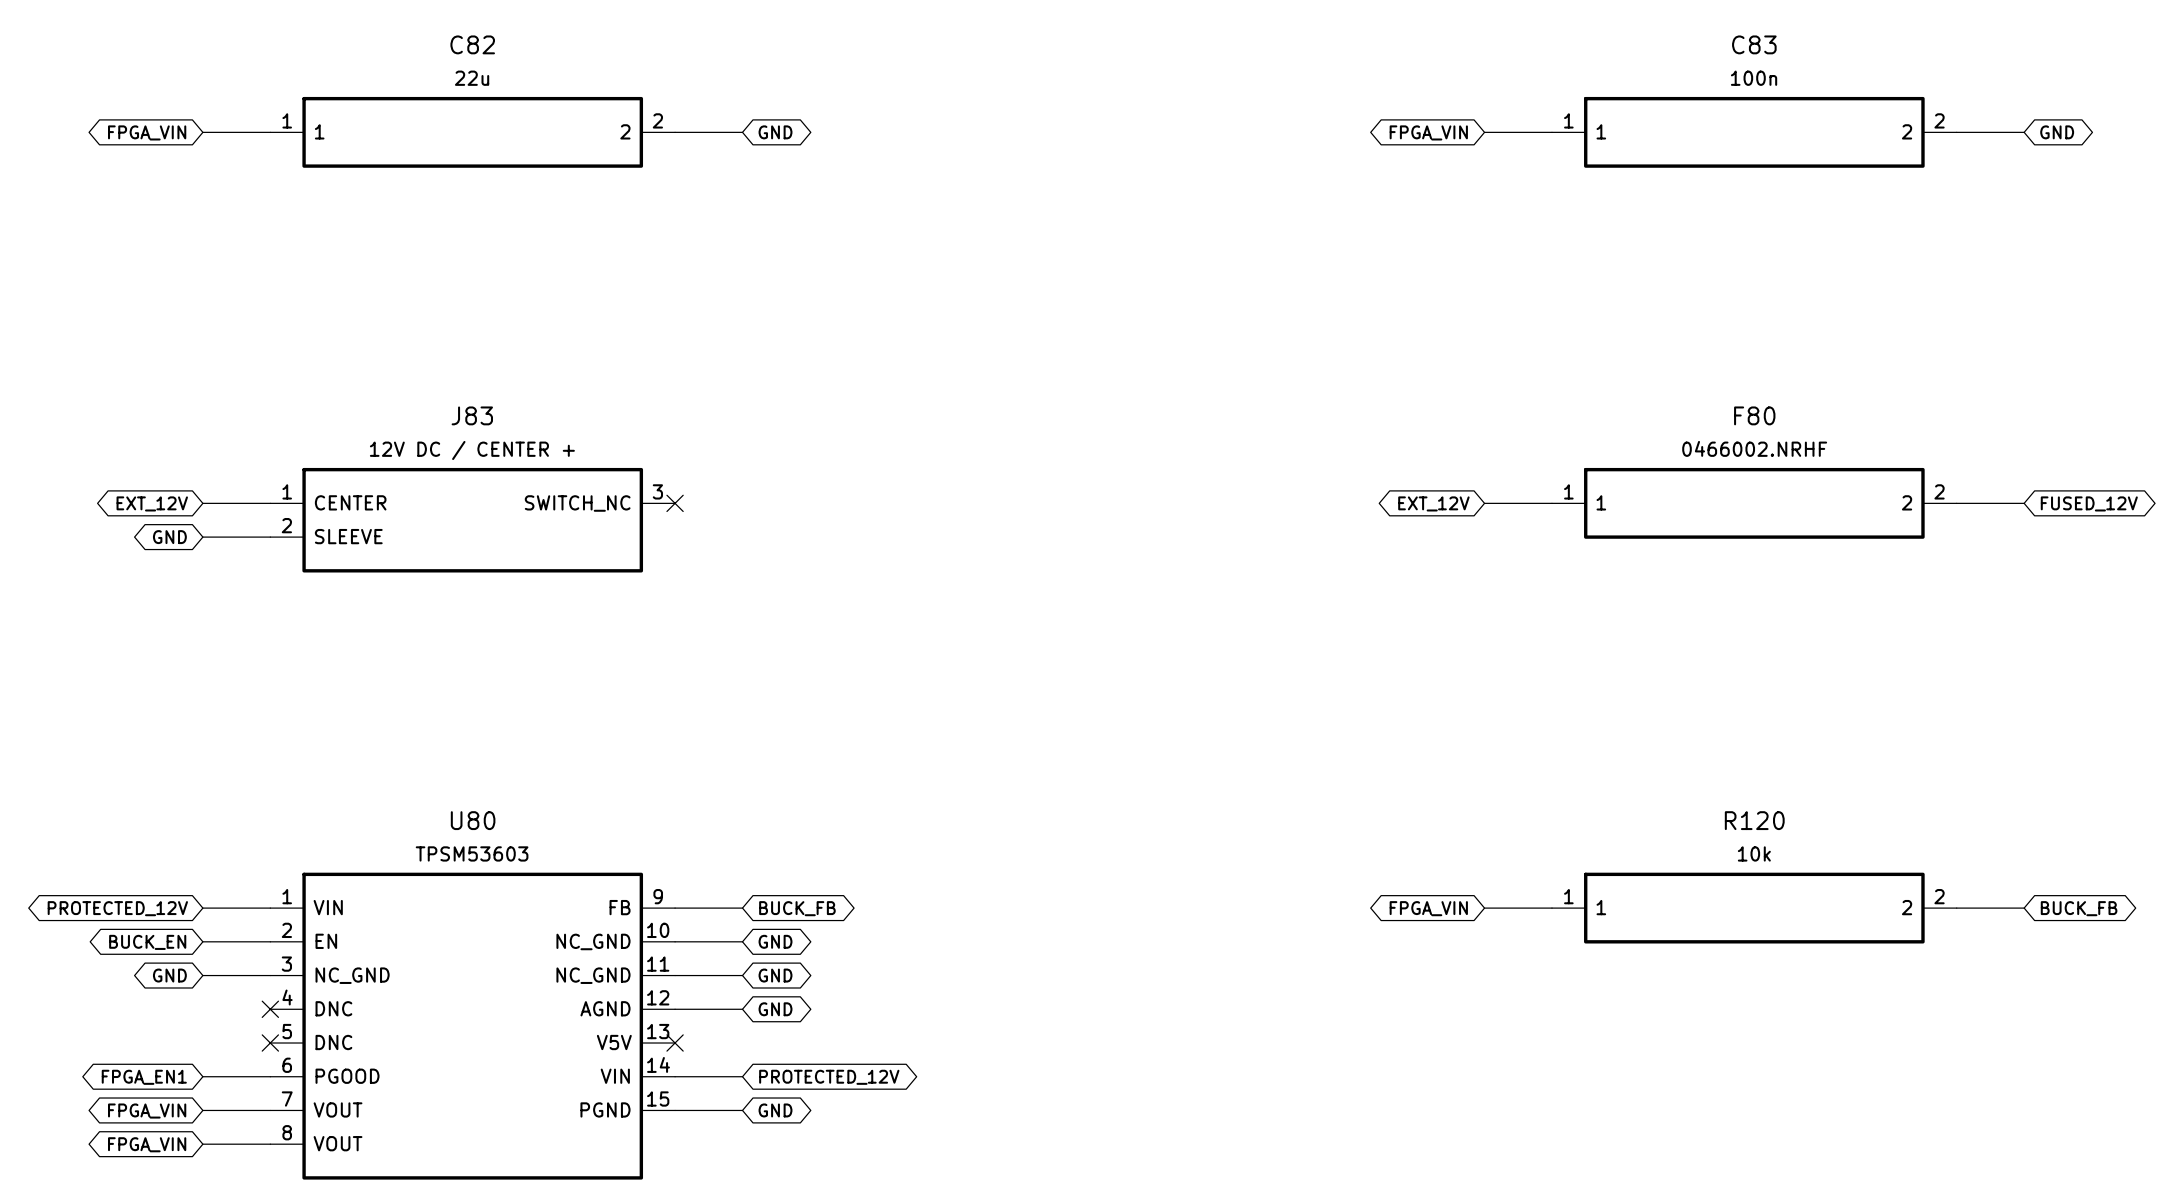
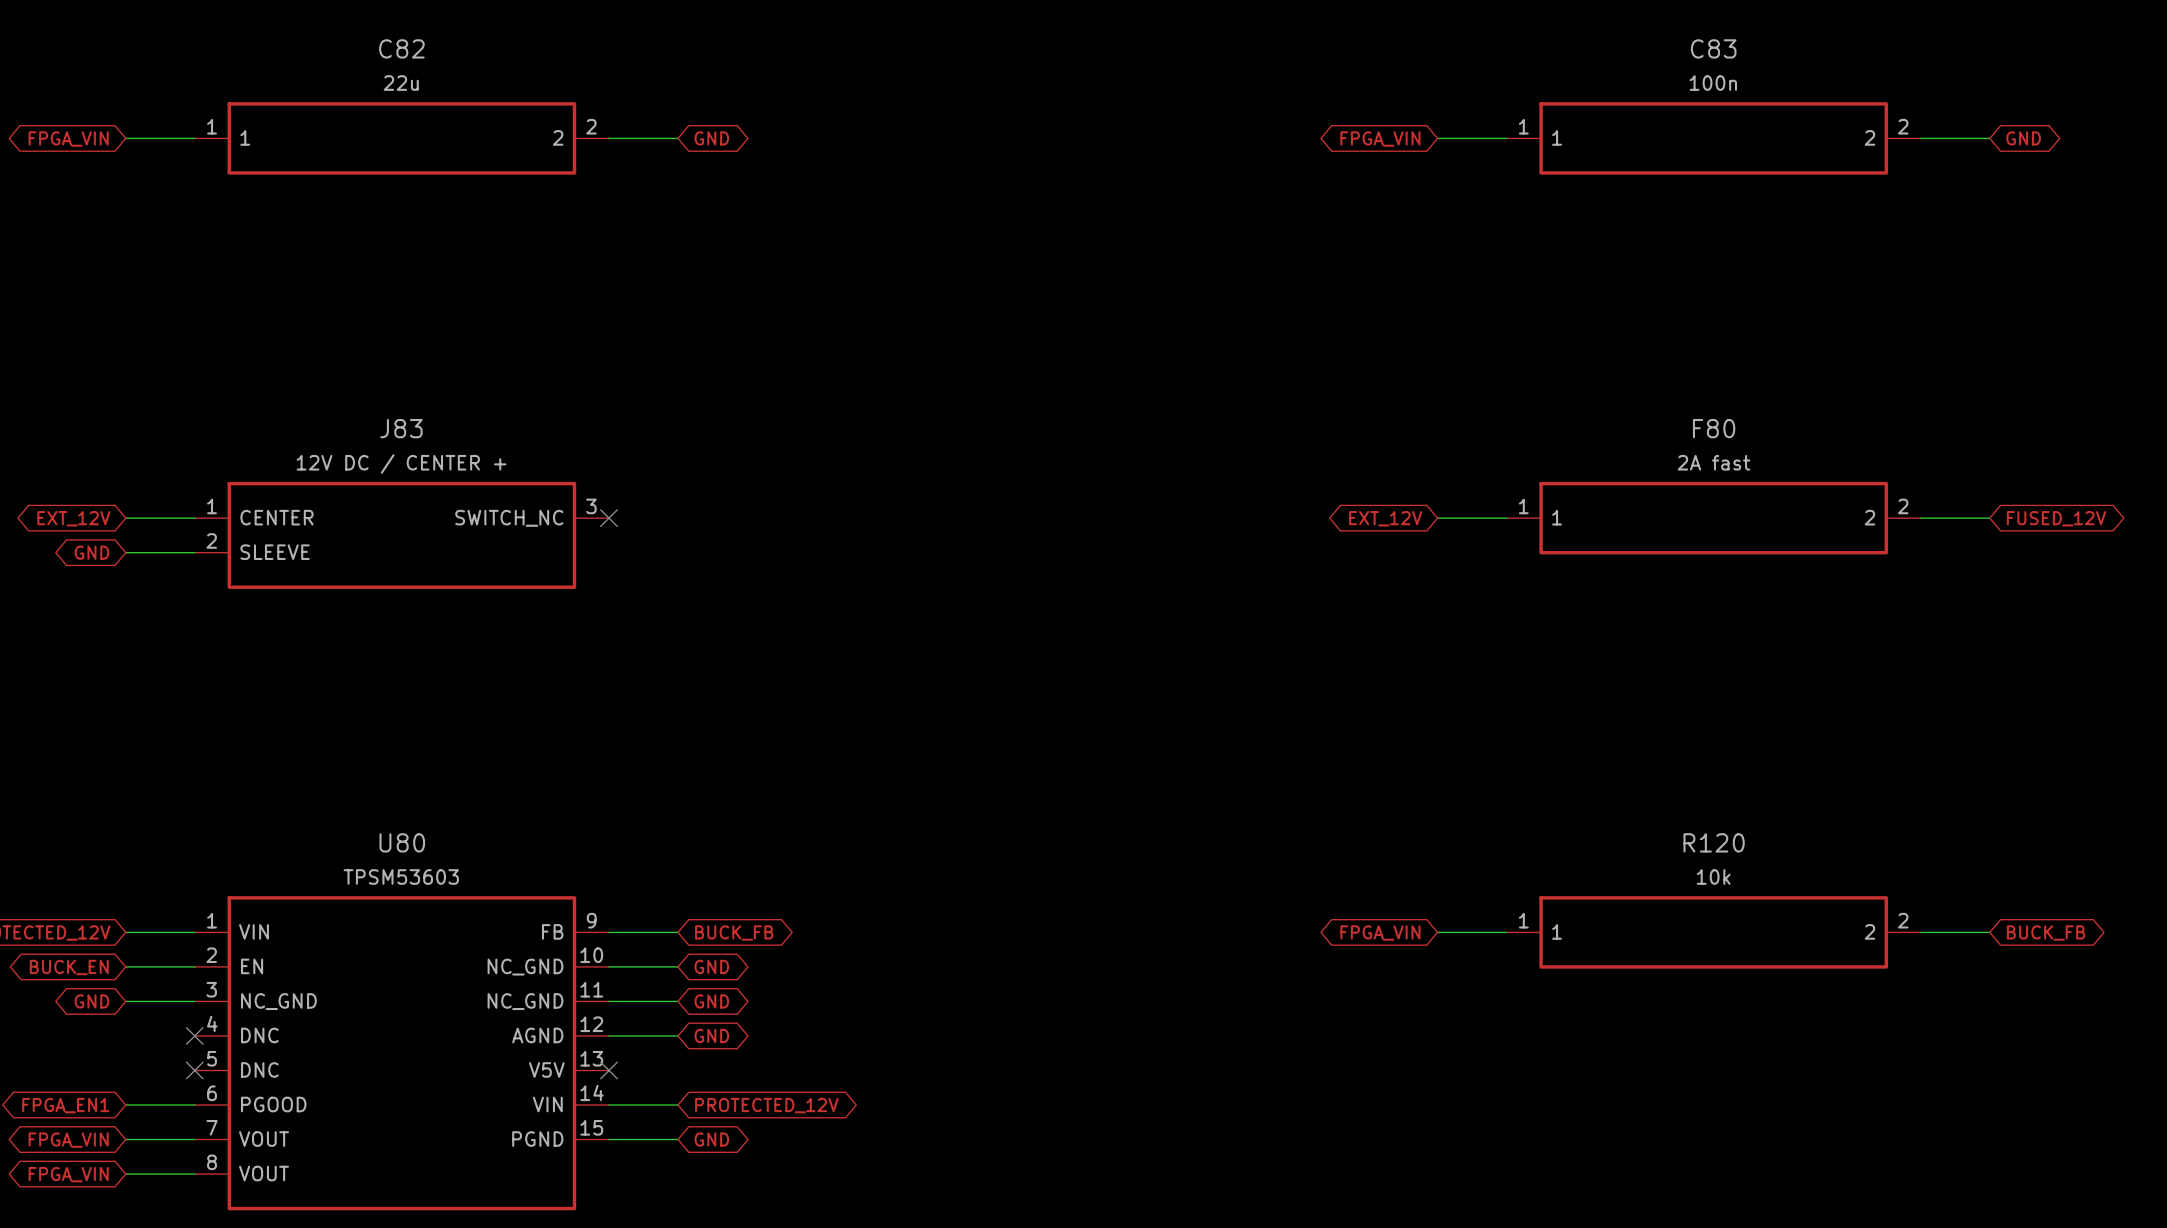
F80 value: 0466002.NRHF (1754, 448) -> 2A fast (1713, 462)

